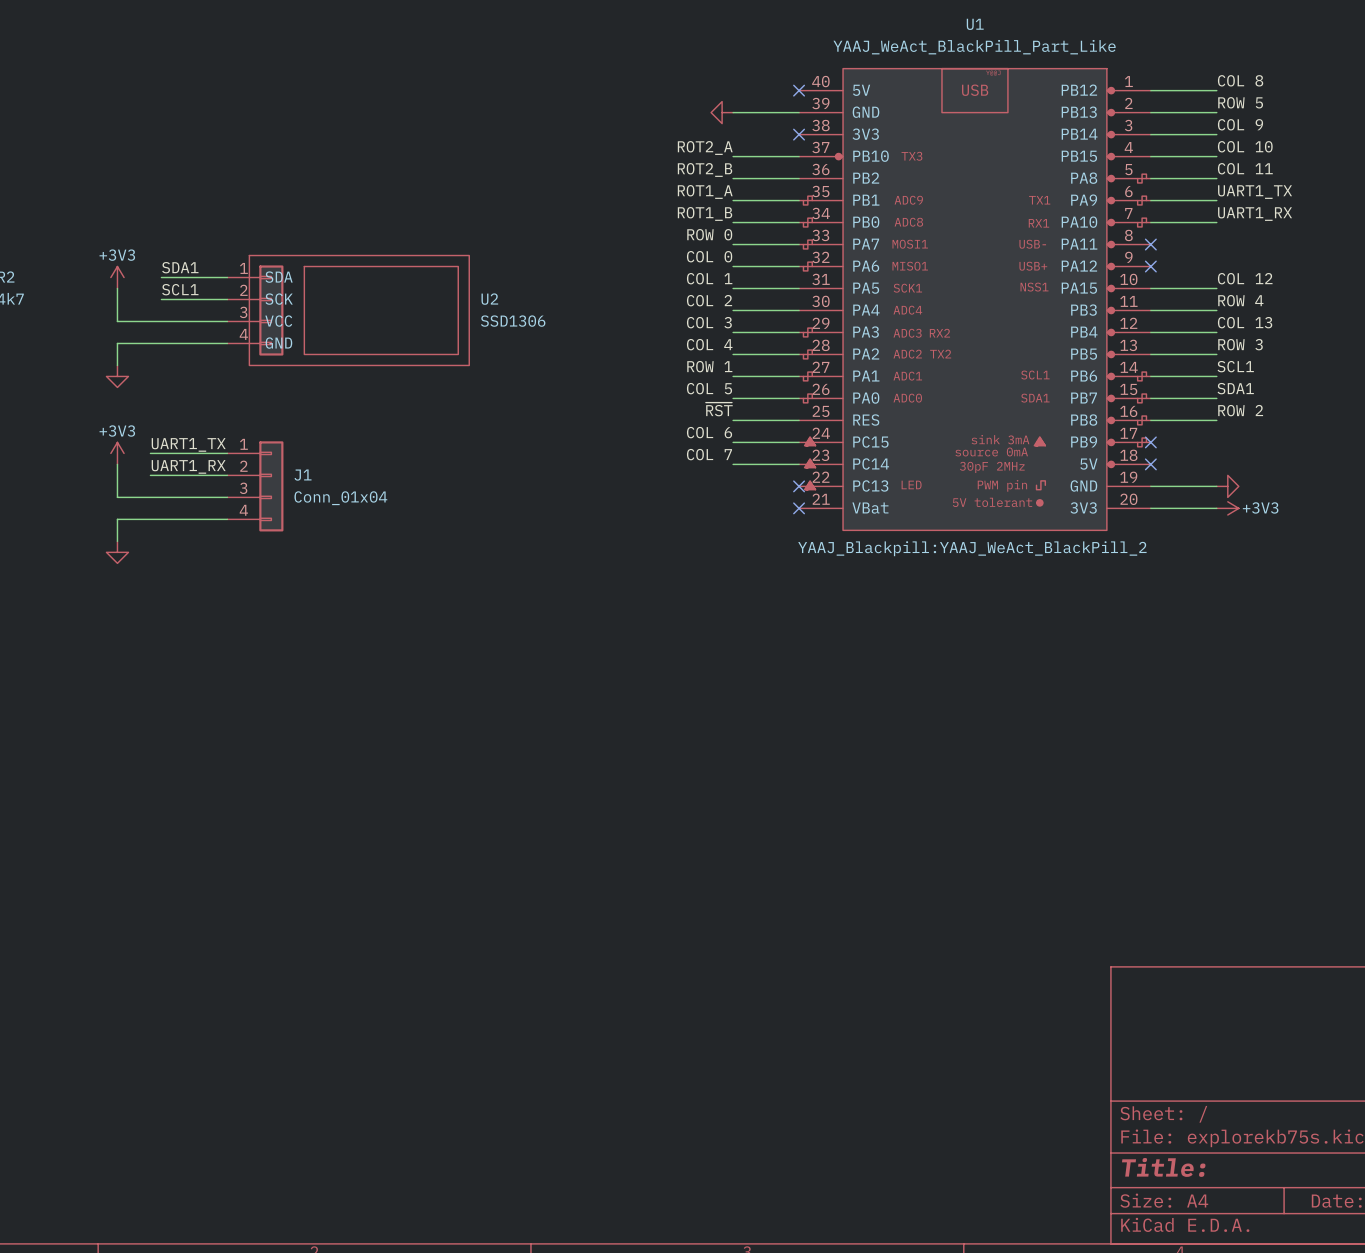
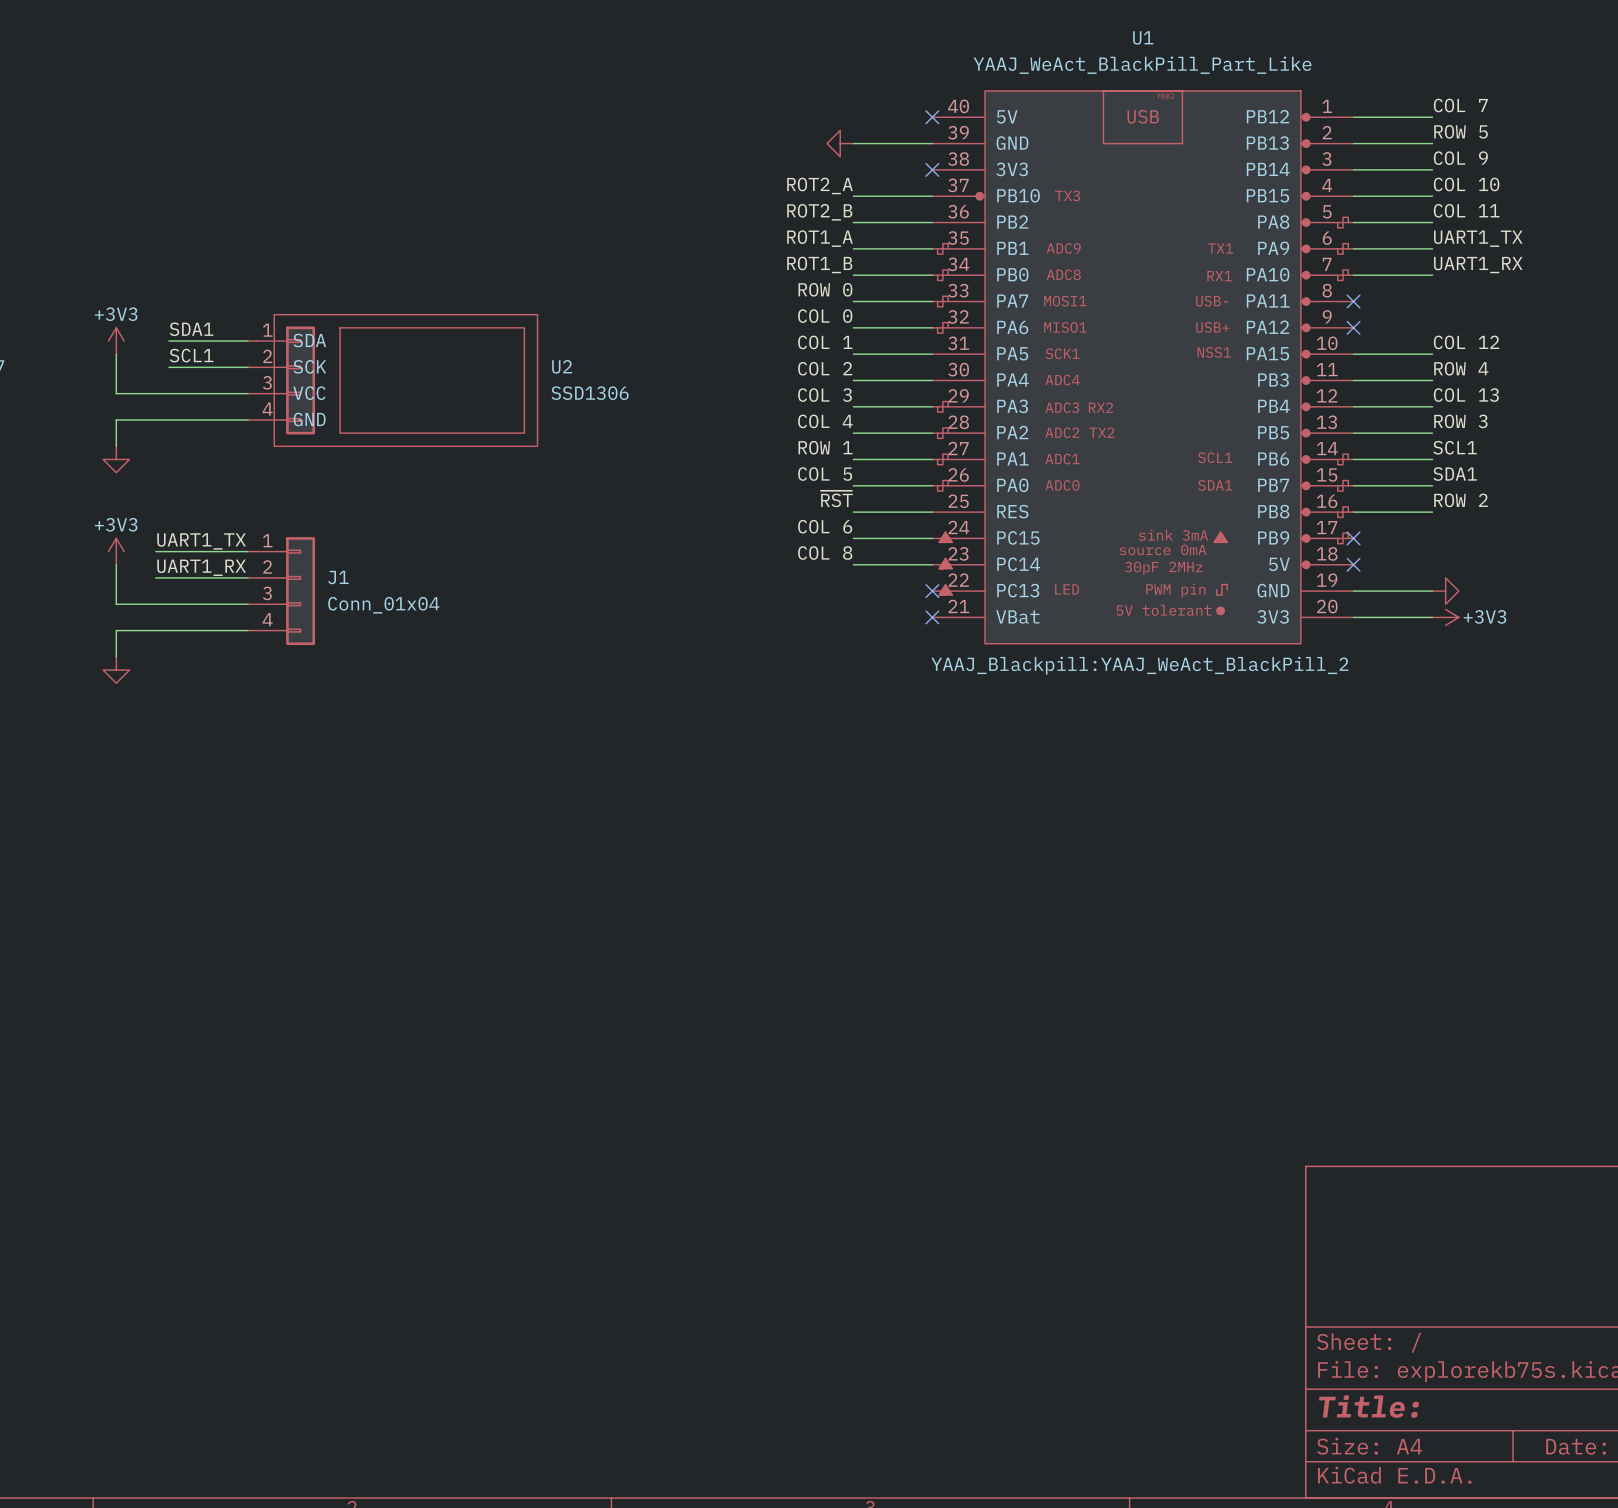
label: COL 8 (1240, 80) -> COL 7 (1460, 105)
label: COL 7 (709, 454) -> COL 8 (825, 553)

